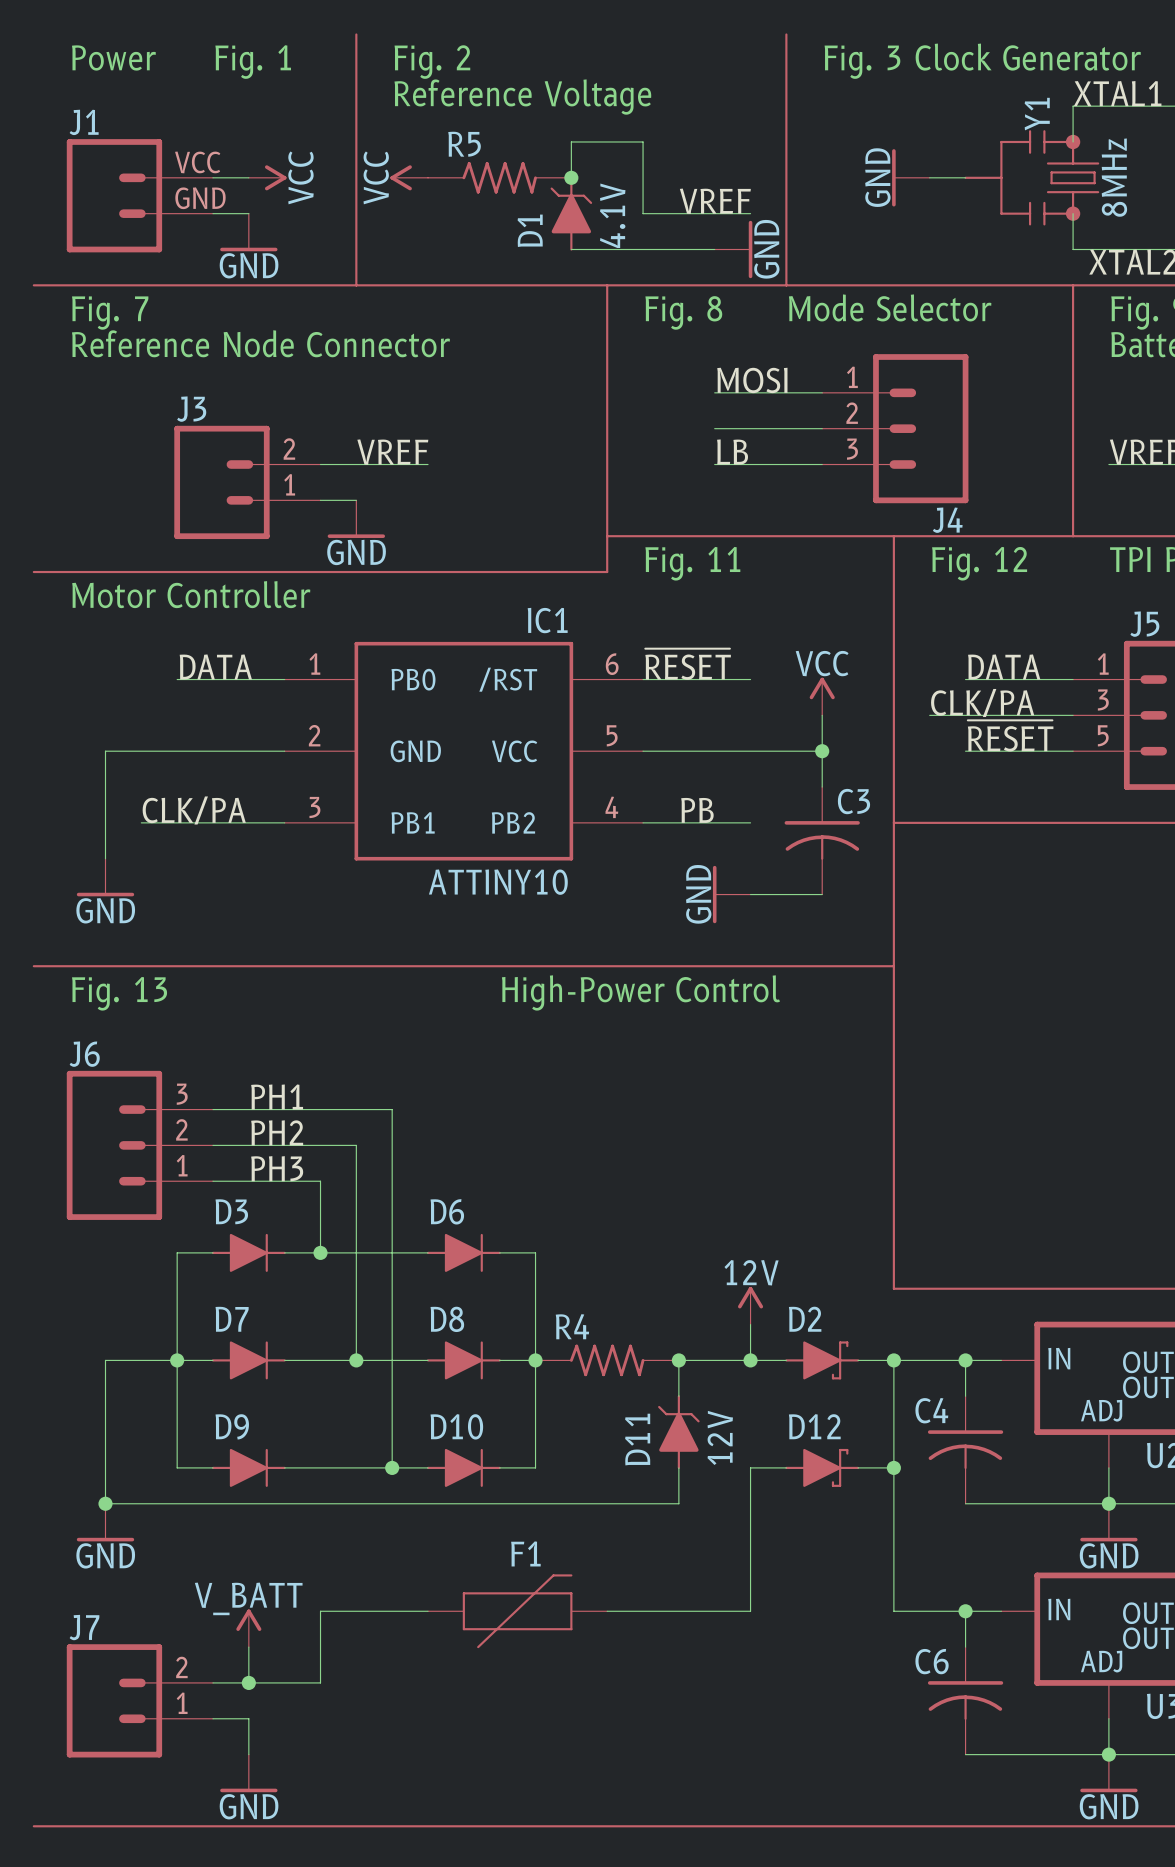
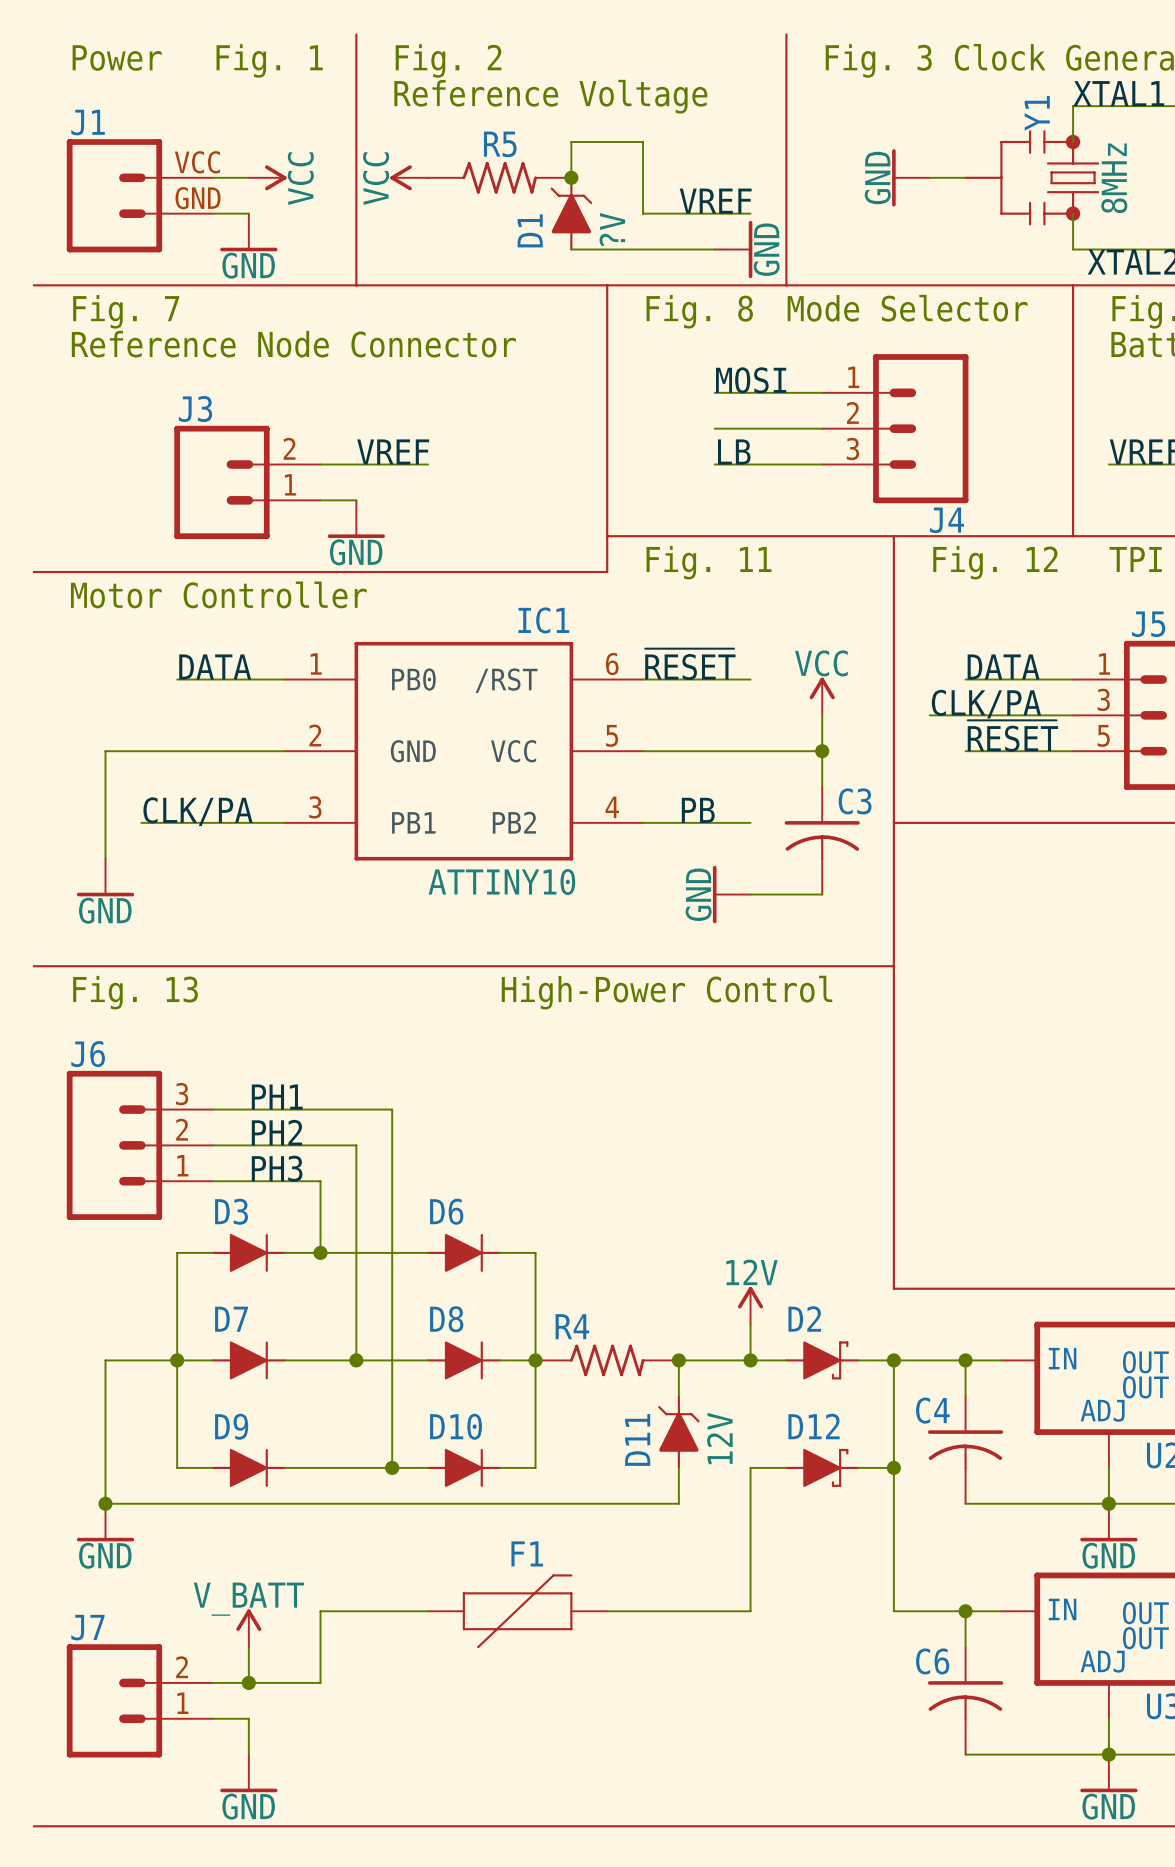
R5 name position: R5 (464, 144) -> R5 (500, 144)
D1 value: 4.1V (612, 215) -> ?V (612, 229)

